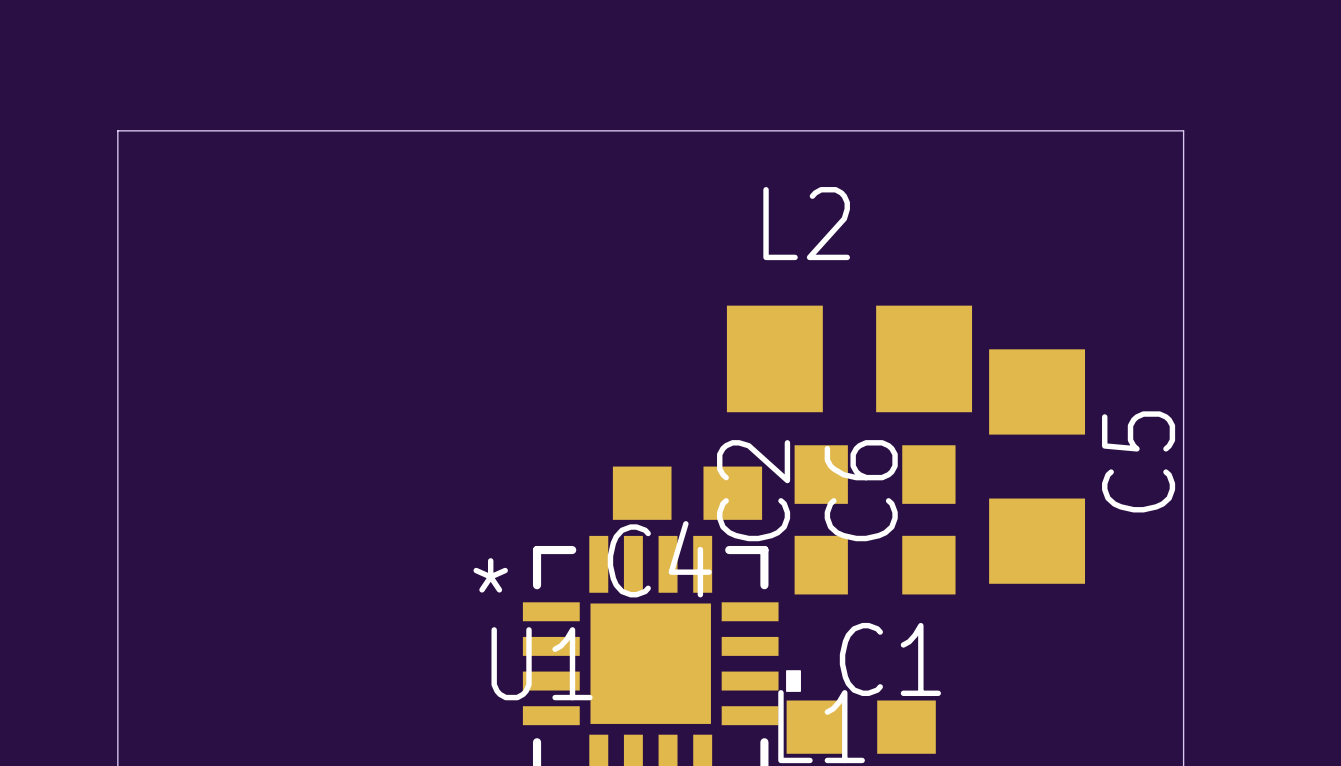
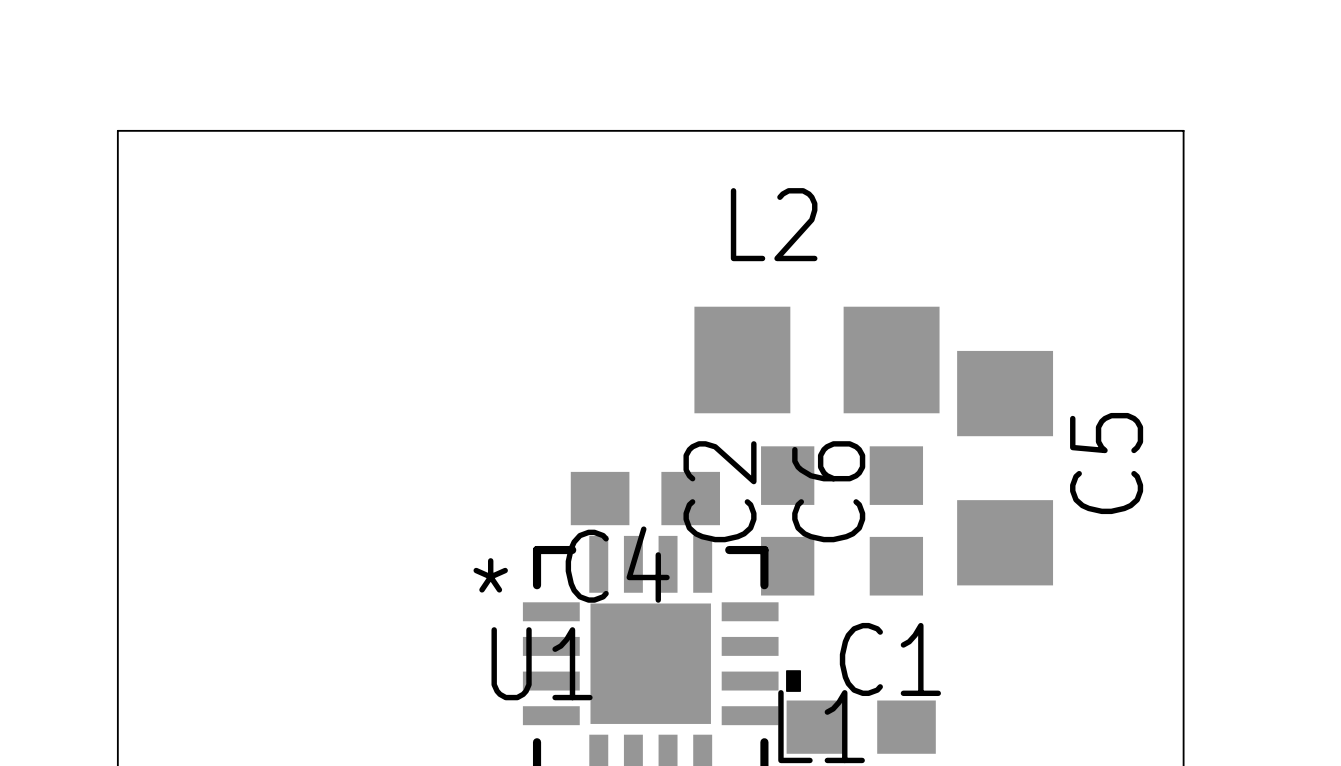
L2 position: (849, 358) -> (816, 359)
C5 position: (1037, 466) -> (1005, 468)
C4 position: (687, 493) -> (645, 498)
C2 position: (821, 519) -> (787, 520)
C6 position: (928, 519) -> (896, 520)

